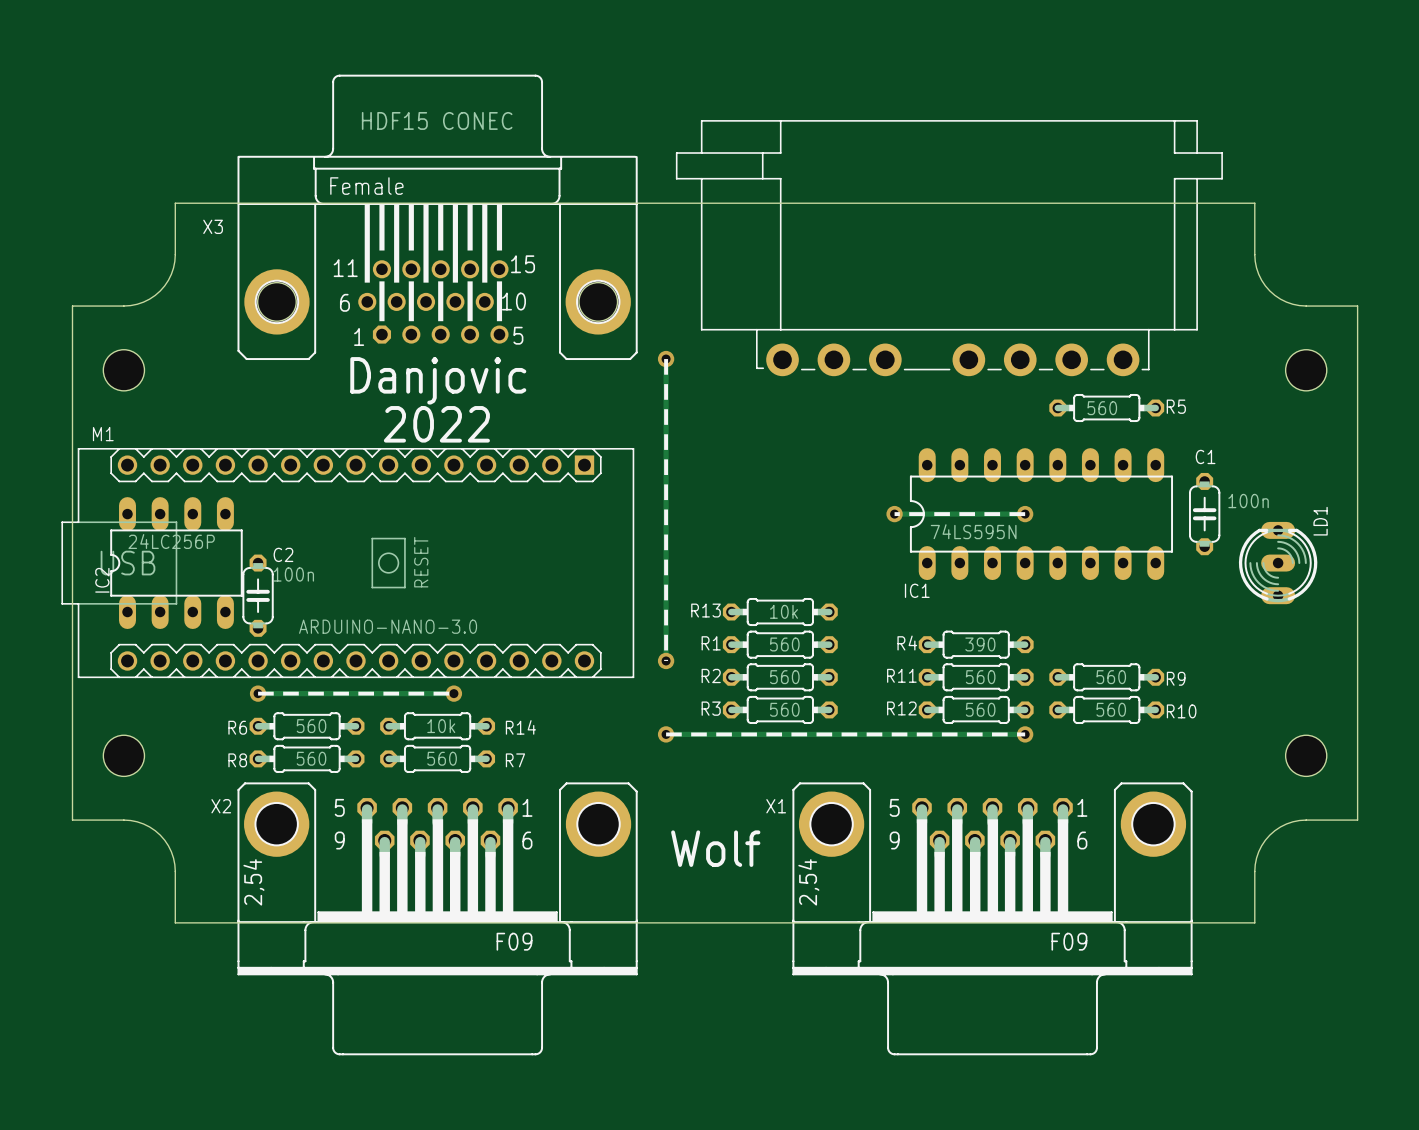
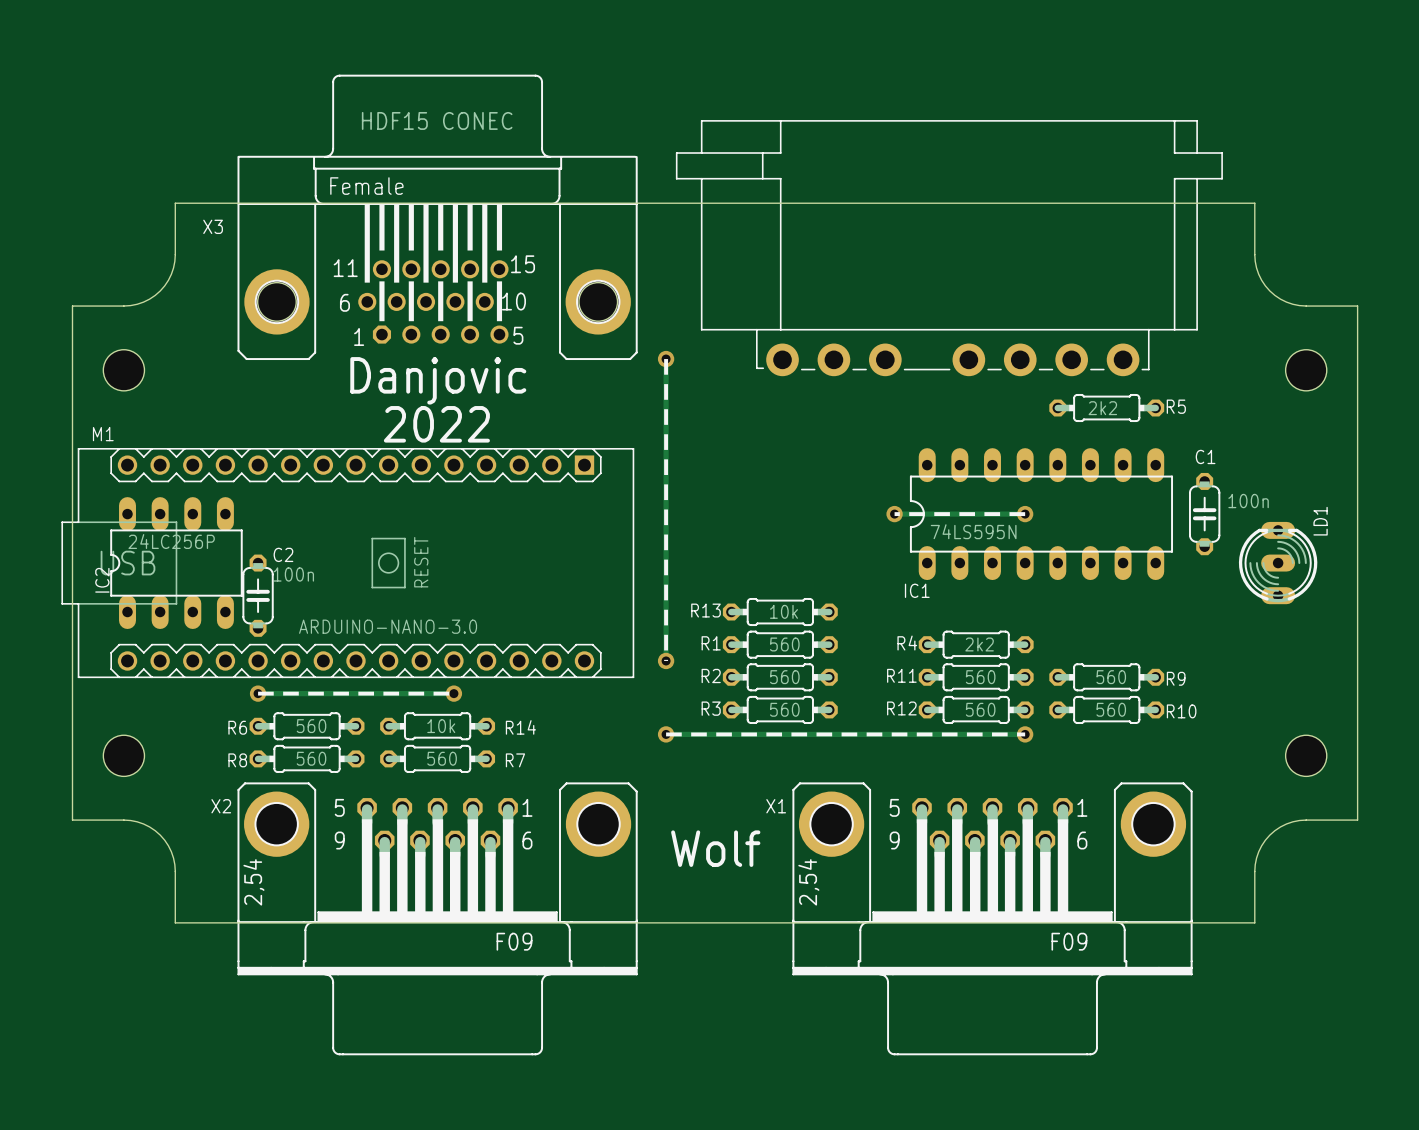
R5 value: 560 (1102, 408) -> 2k2 (1102, 408)
R4 value: 390 (980, 644) -> 2k2 (979, 644)

